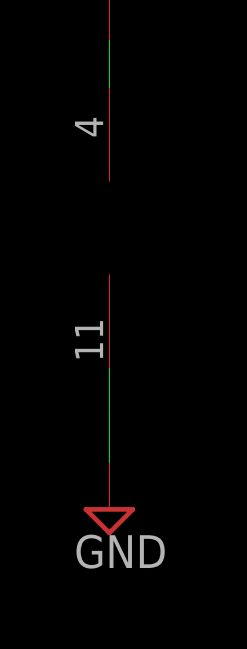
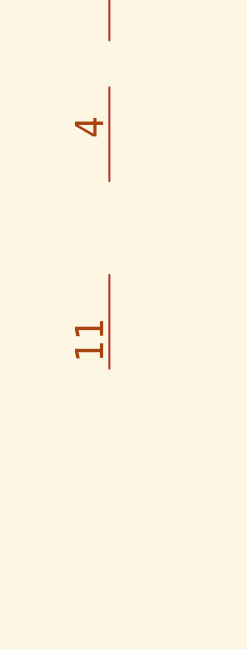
wire: (109, 40) (109, 87) -> none
wire: (109, 368) (109, 462) -> none
power symbol: GND (109, 498) -> none

